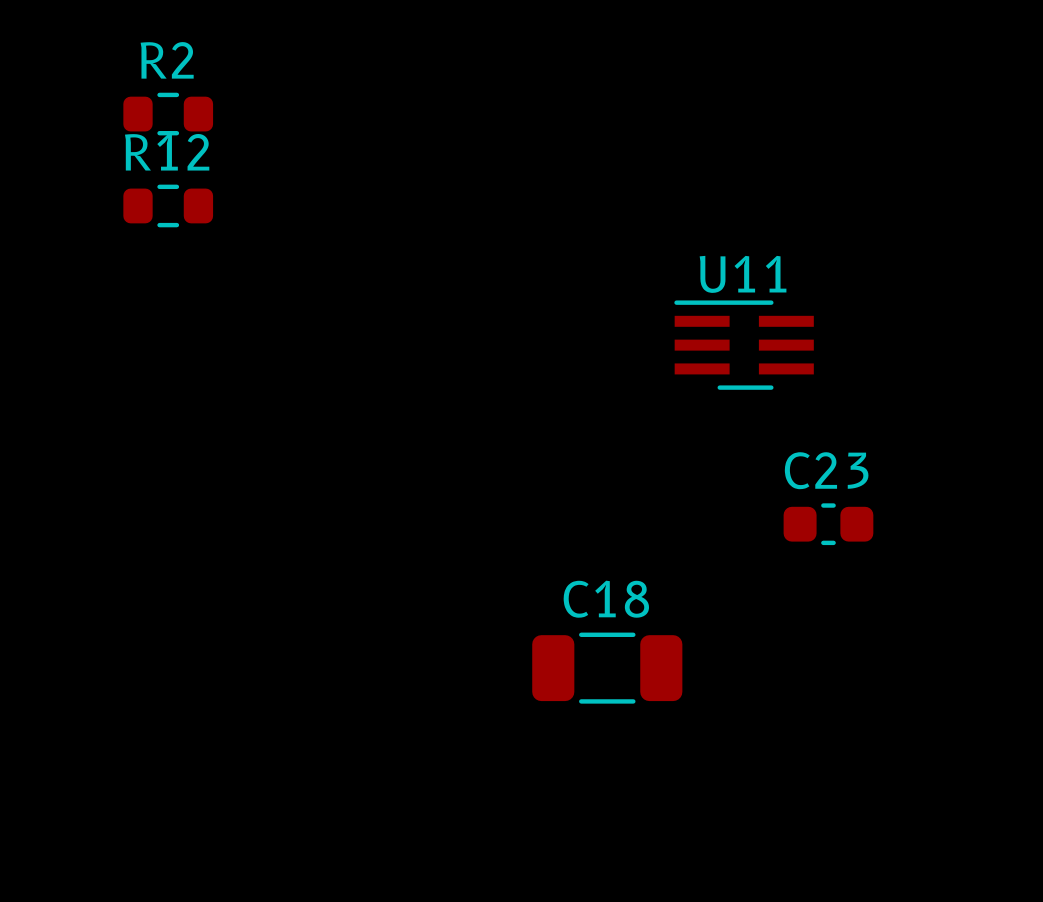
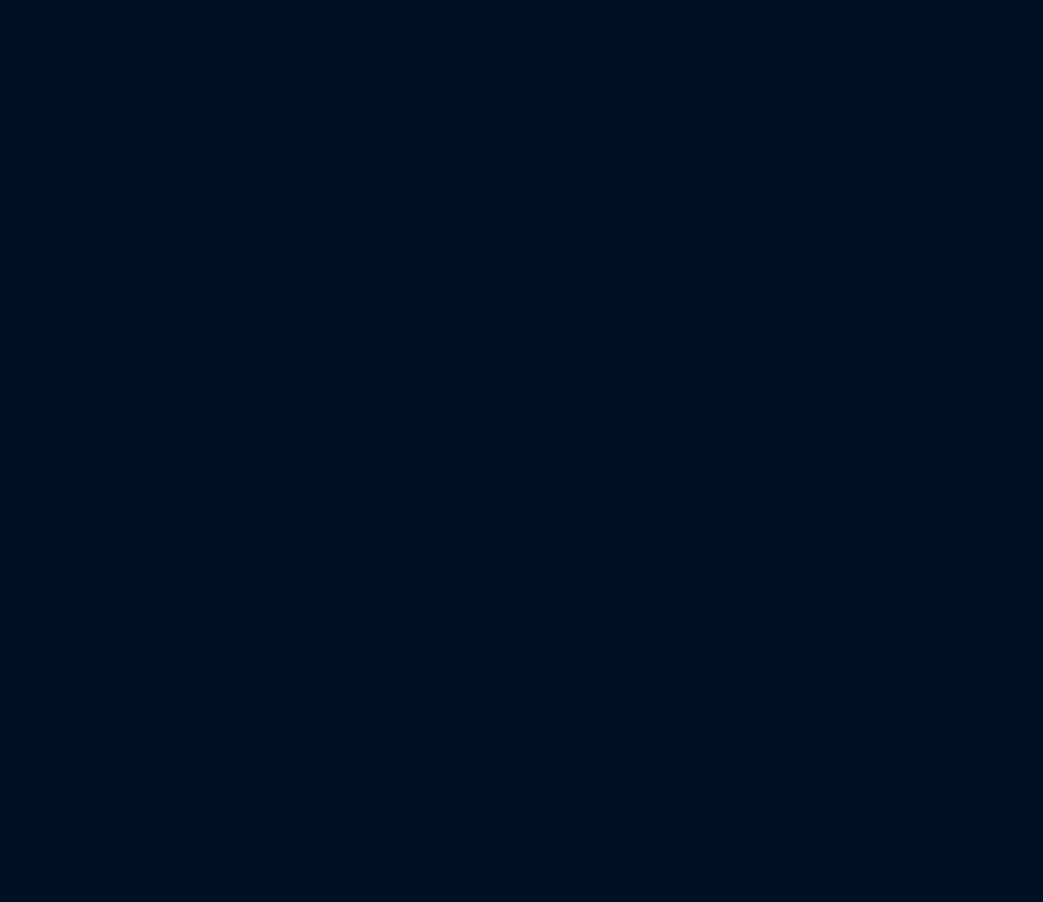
R2: (168, 114) -> none
R12: (168, 205) -> none
U11: (744, 345) -> none
C23: (828, 524) -> none
C18: (607, 668) -> none

